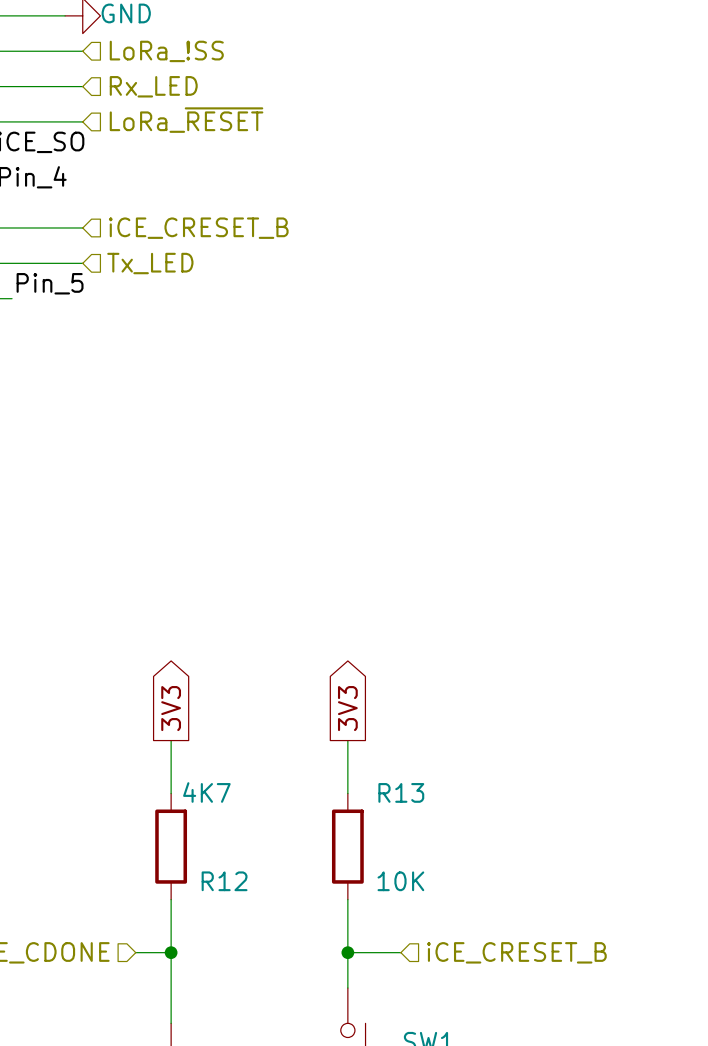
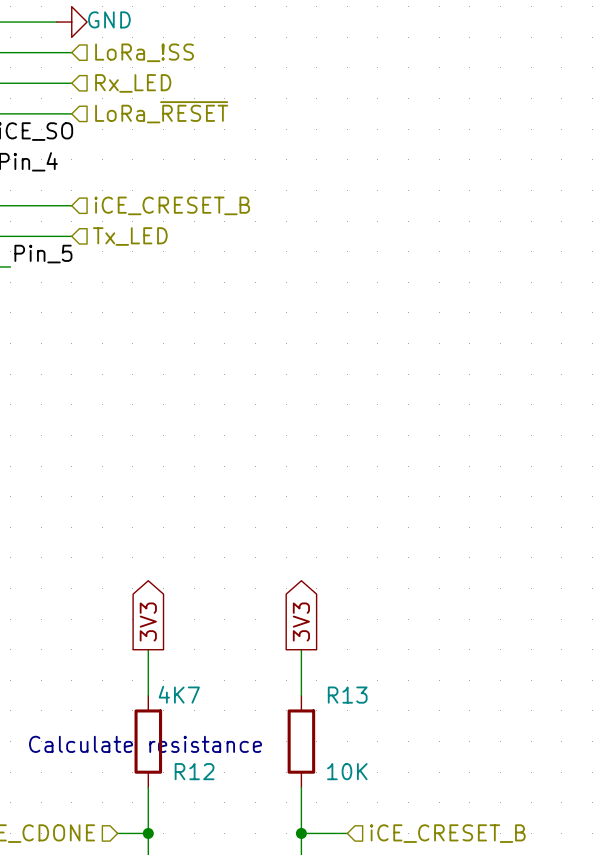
text: none -> Calculate resistance (145, 744)

